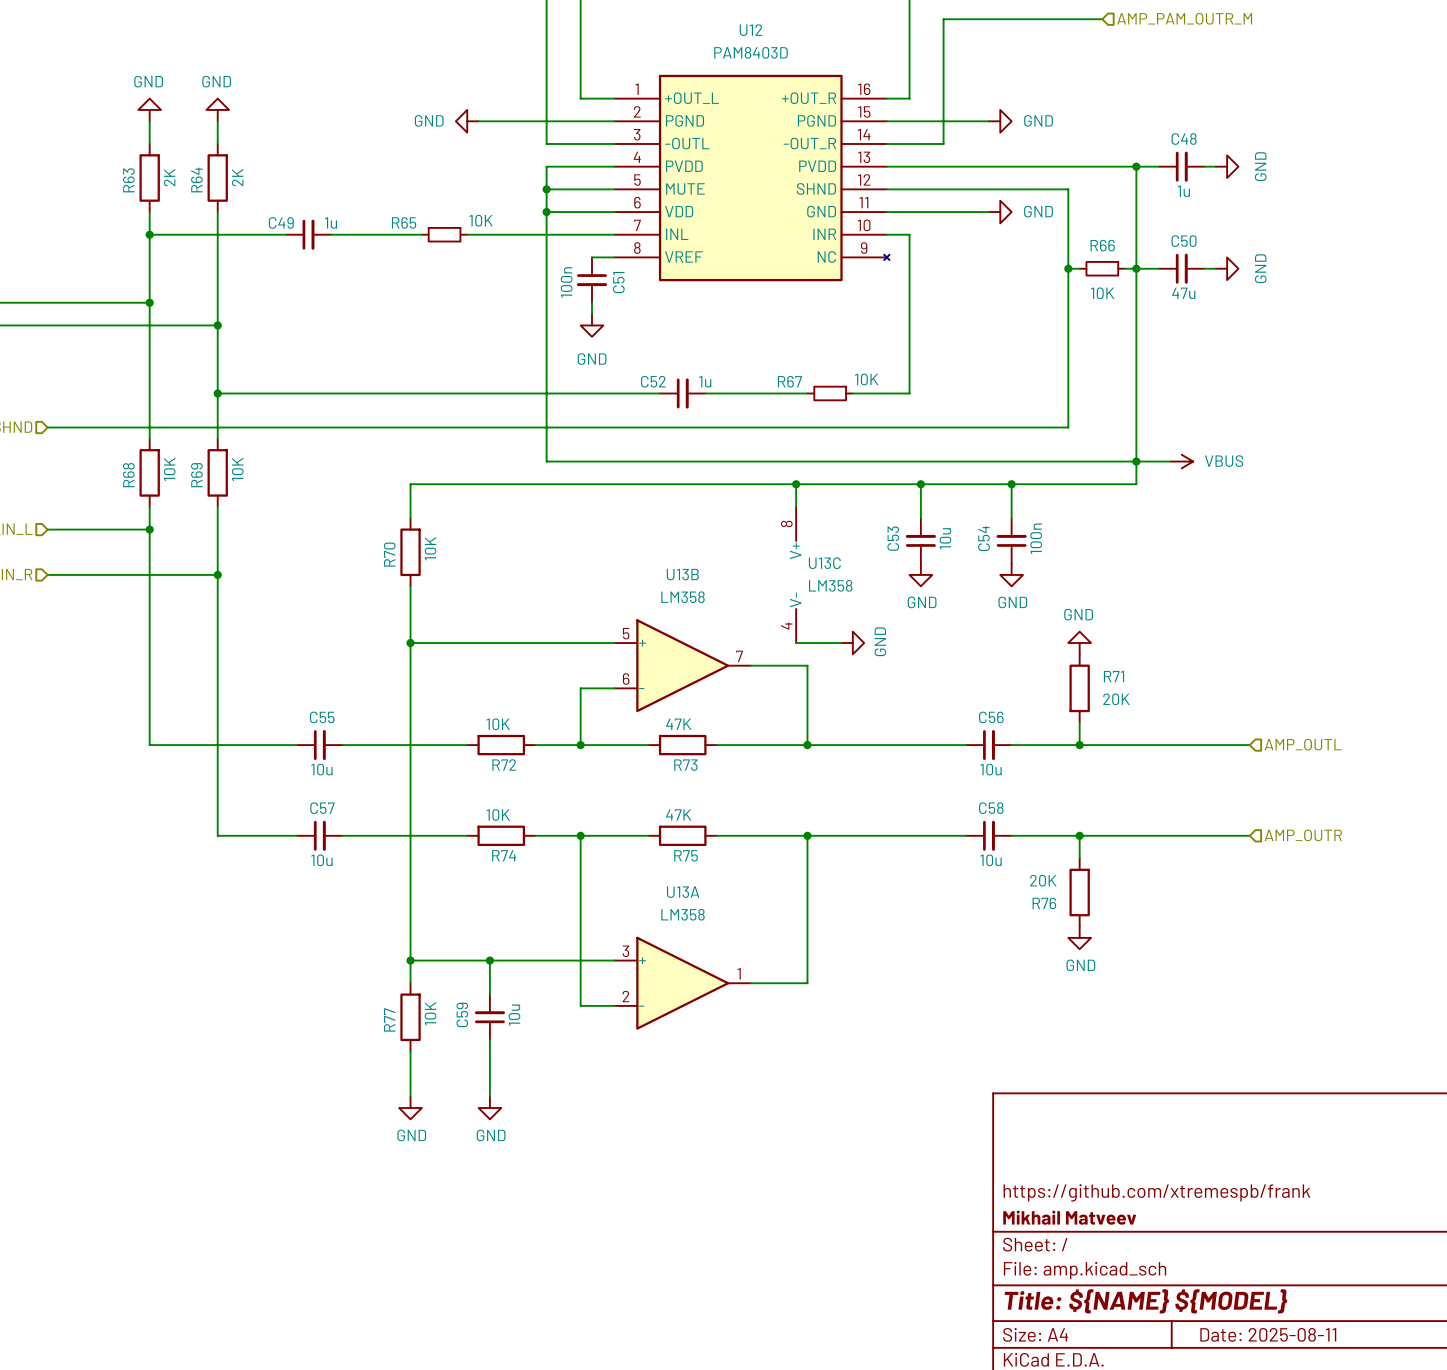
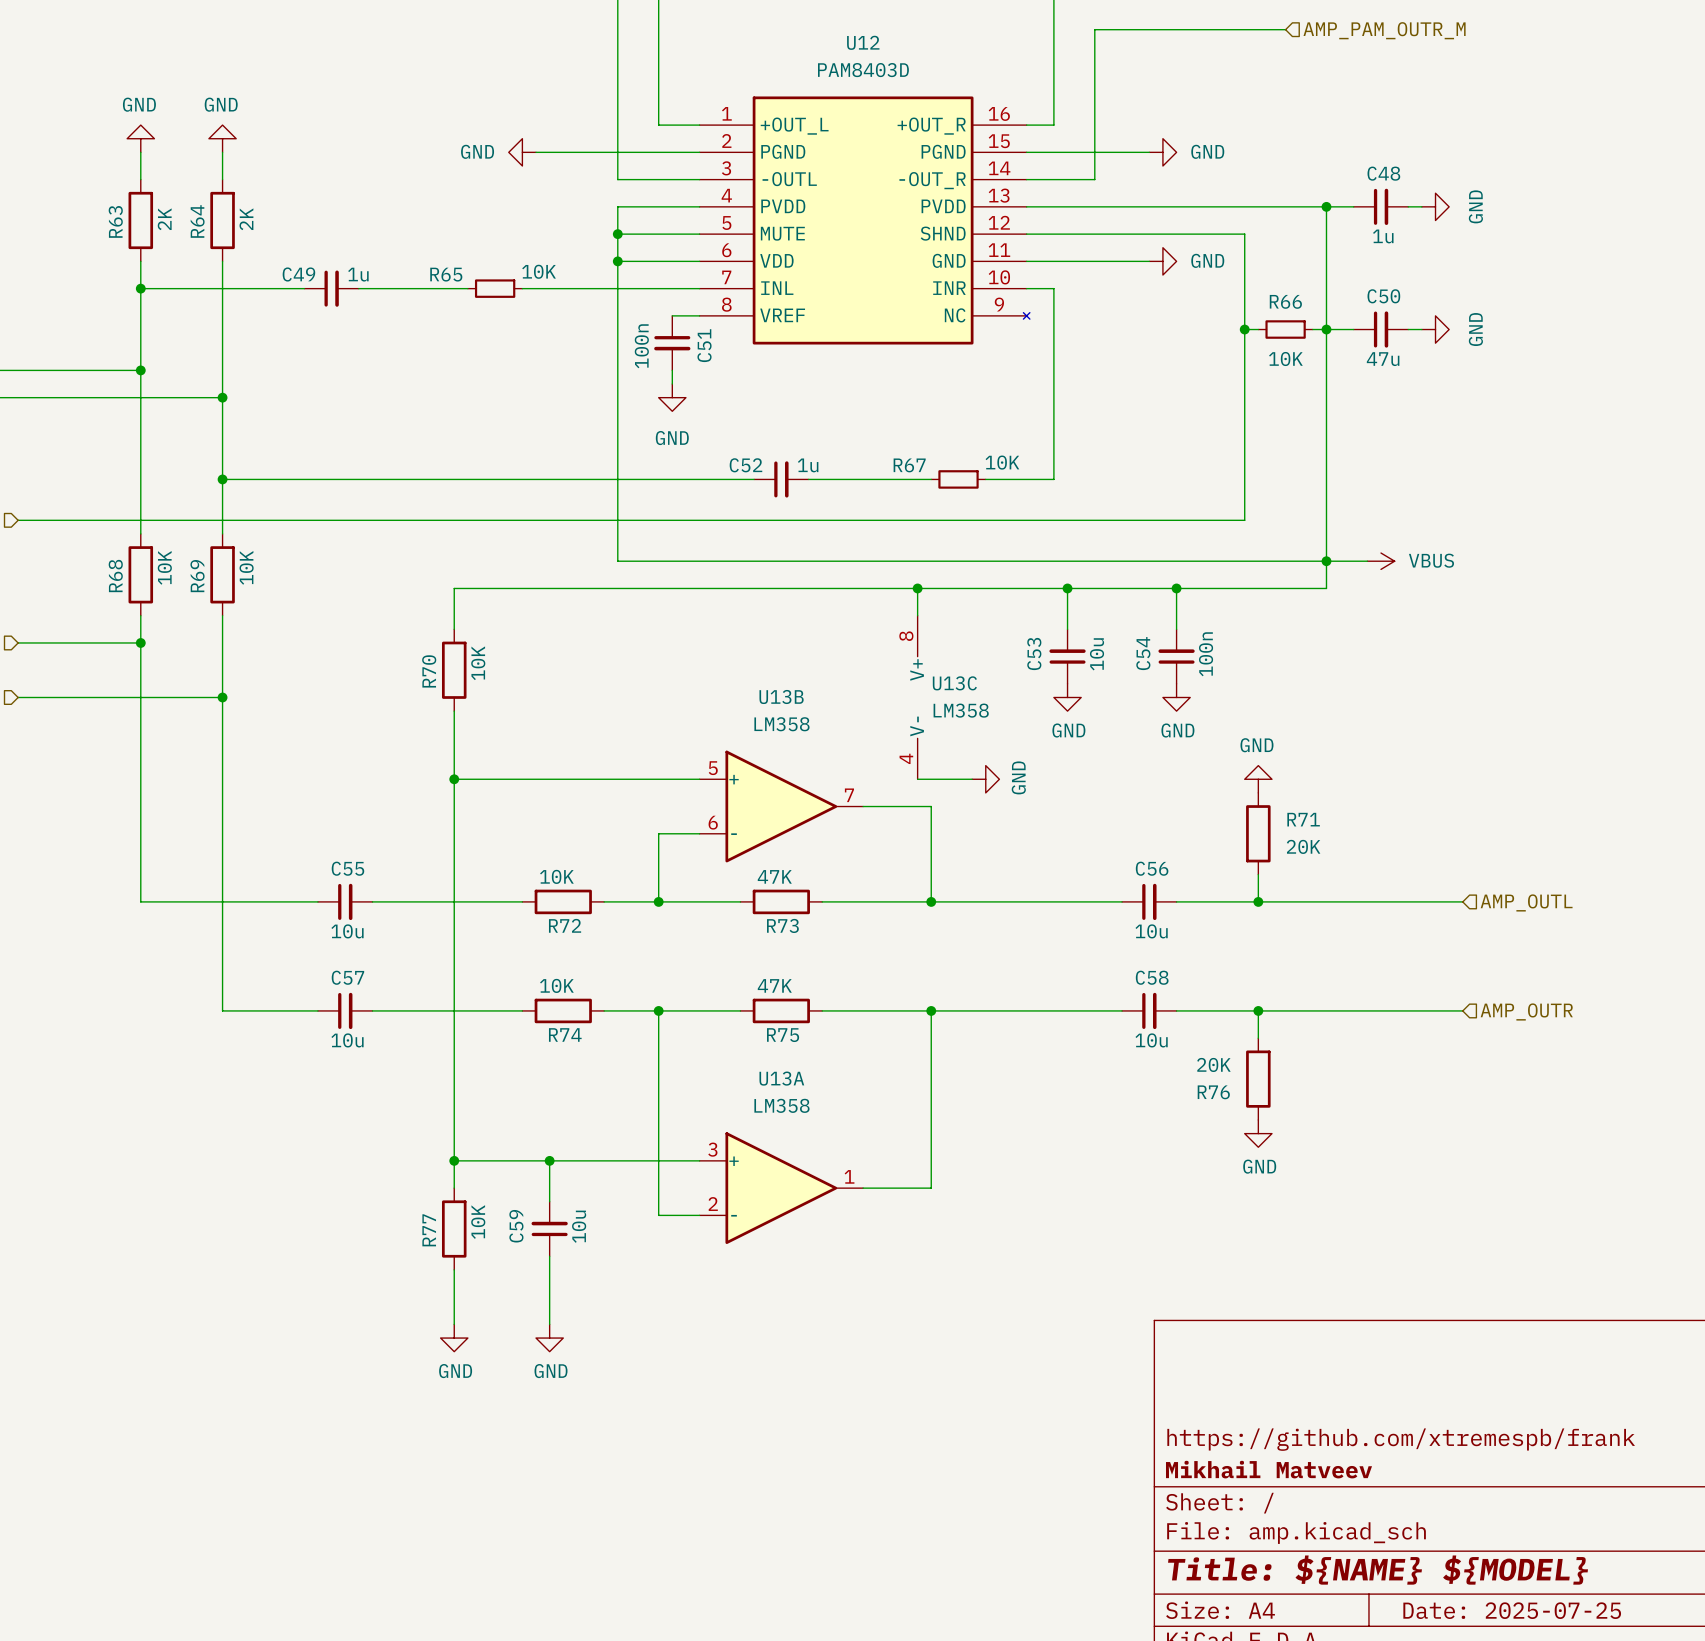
title block: Date: 2025-08-11 (1268, 1334) -> Date: 2025-07-25 (1512, 1610)

